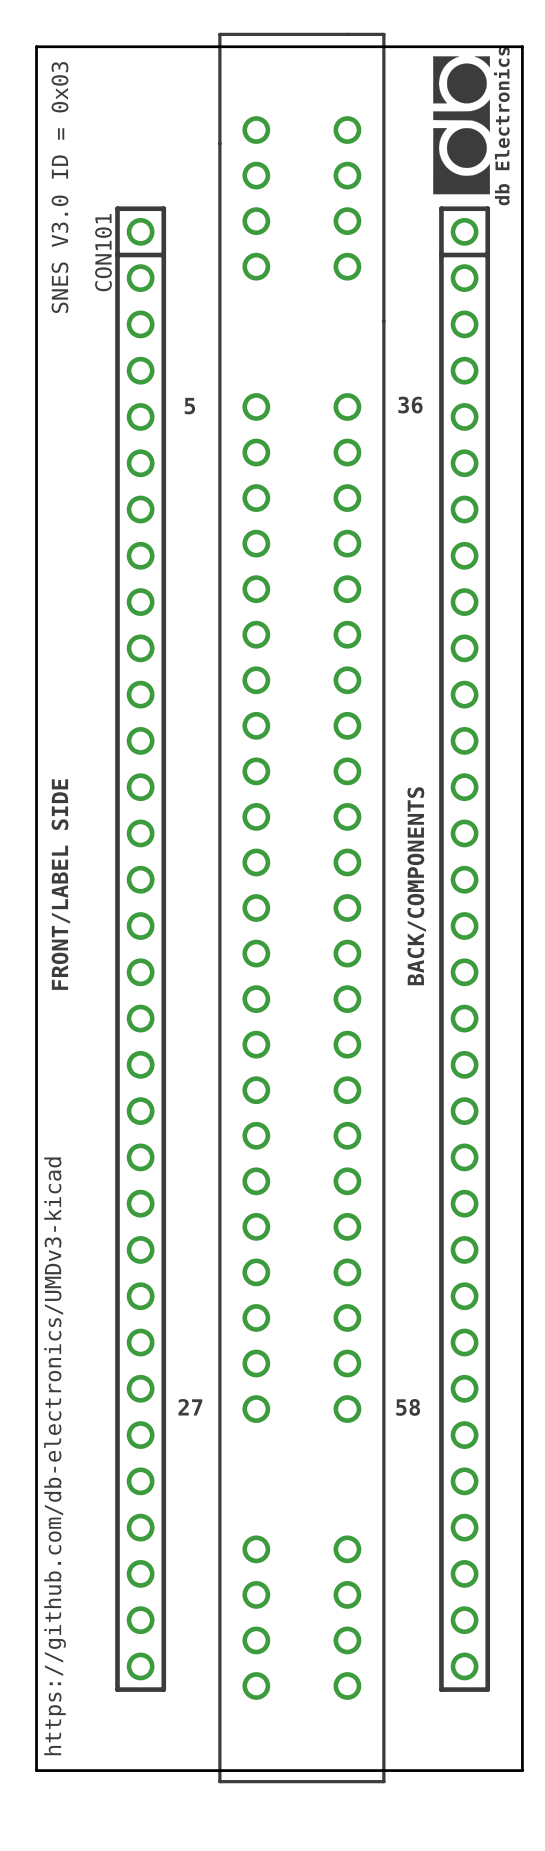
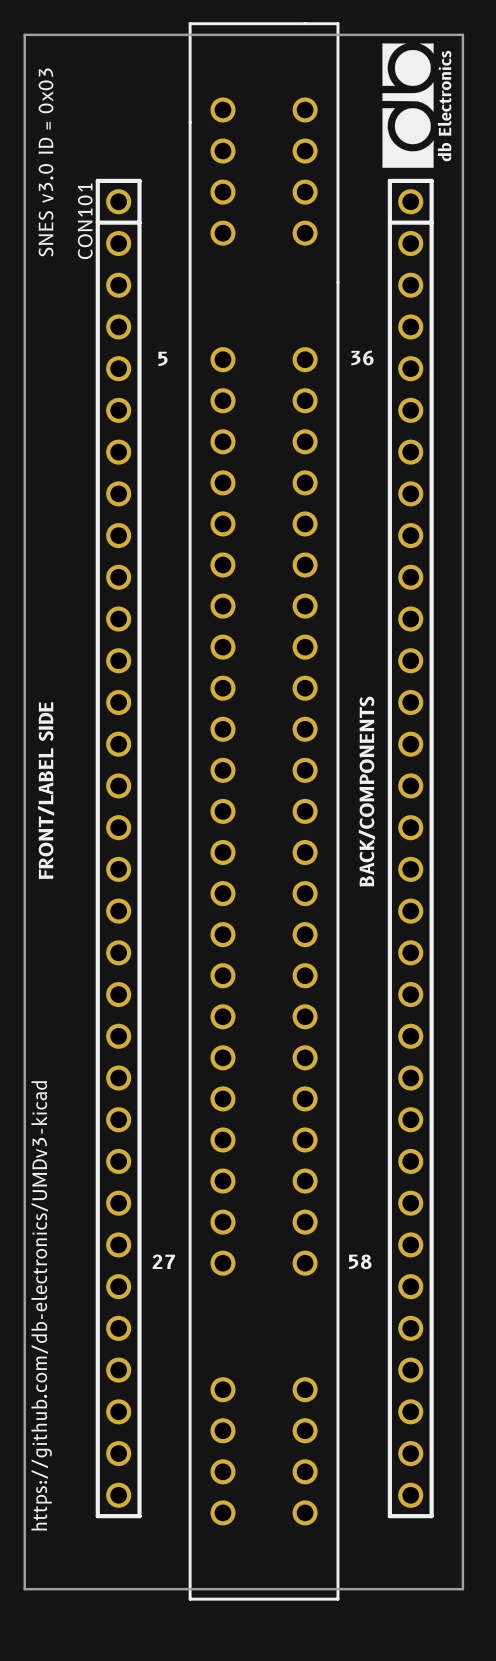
text: SNES V3.0 ID = 0x03 (59, 187) -> SNES v3.0 ID = 0x03 (46, 162)

